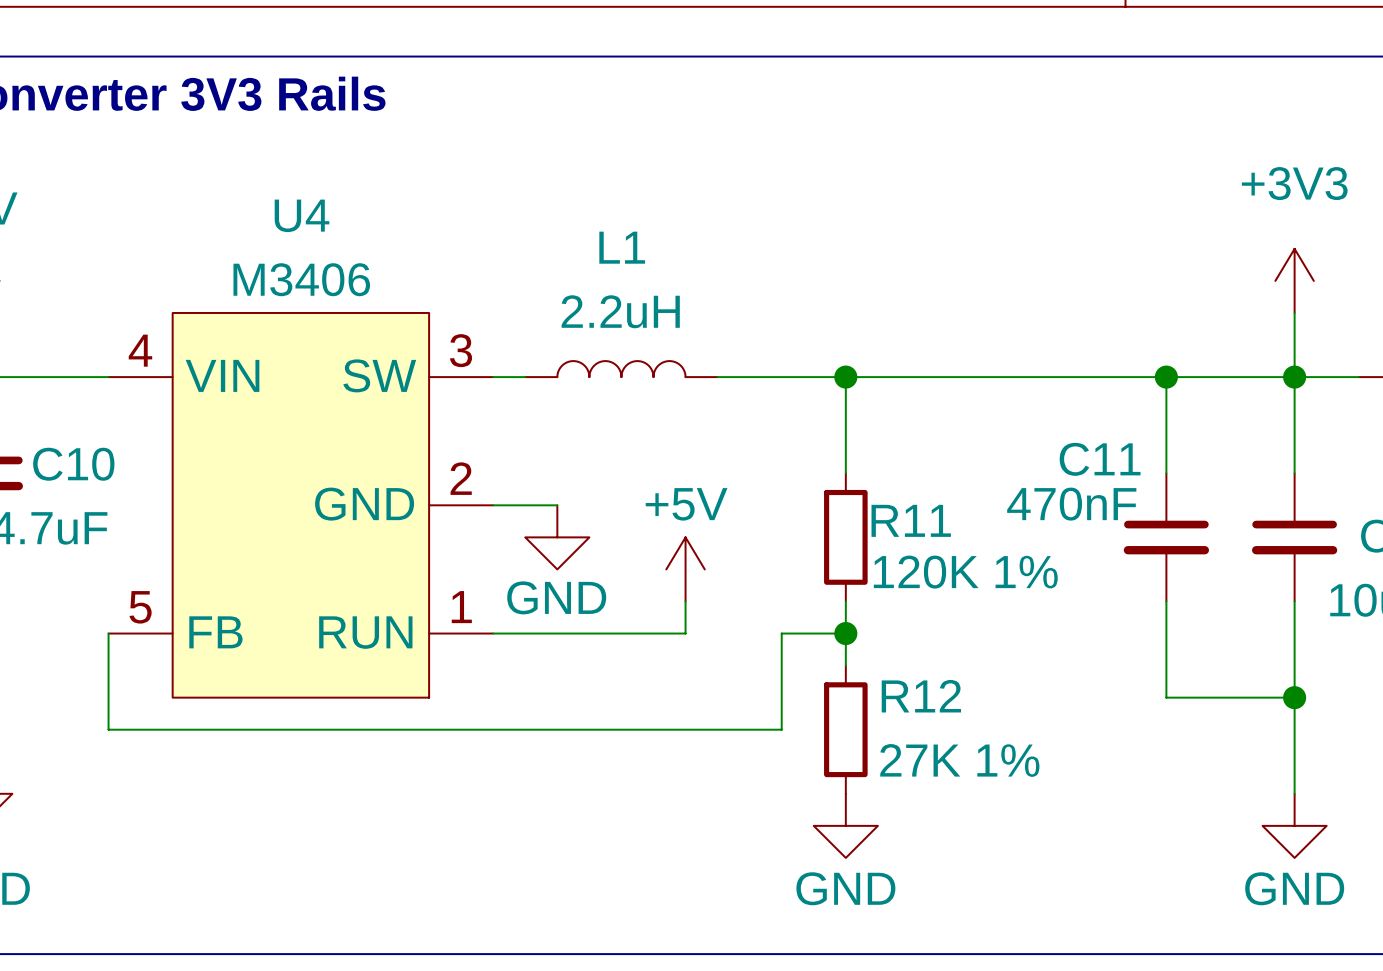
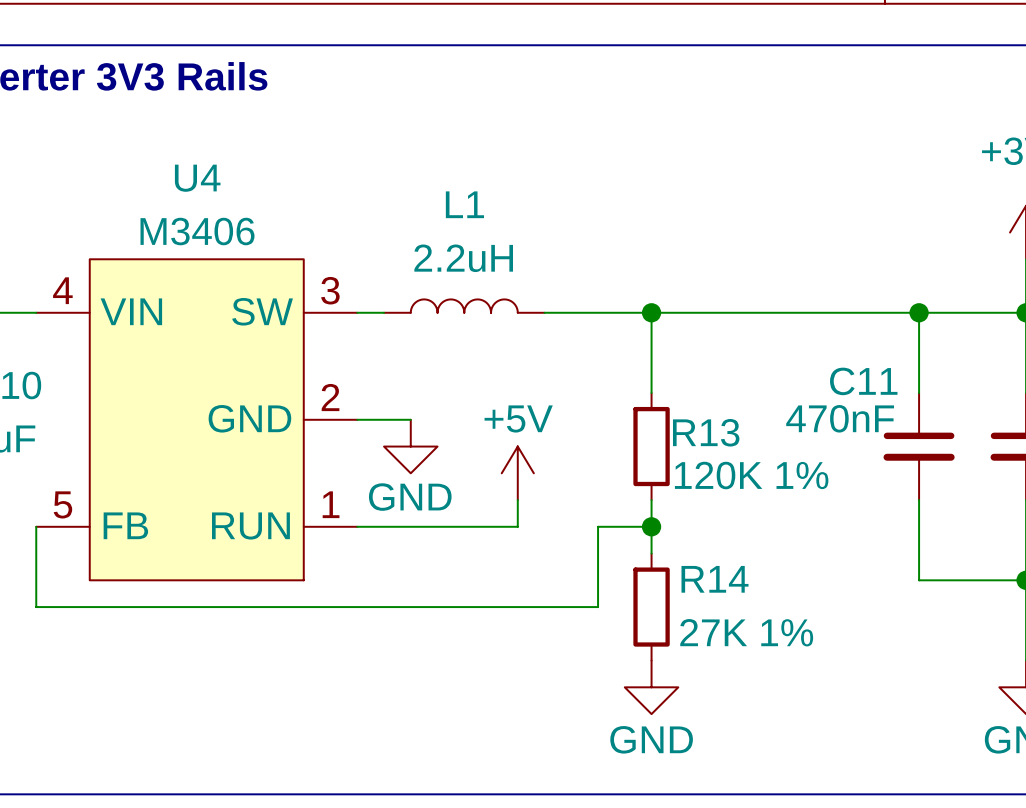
R11 name: R11 (911, 520) -> R13 (706, 432)
R12 name: R12 (921, 696) -> R14 (715, 579)

